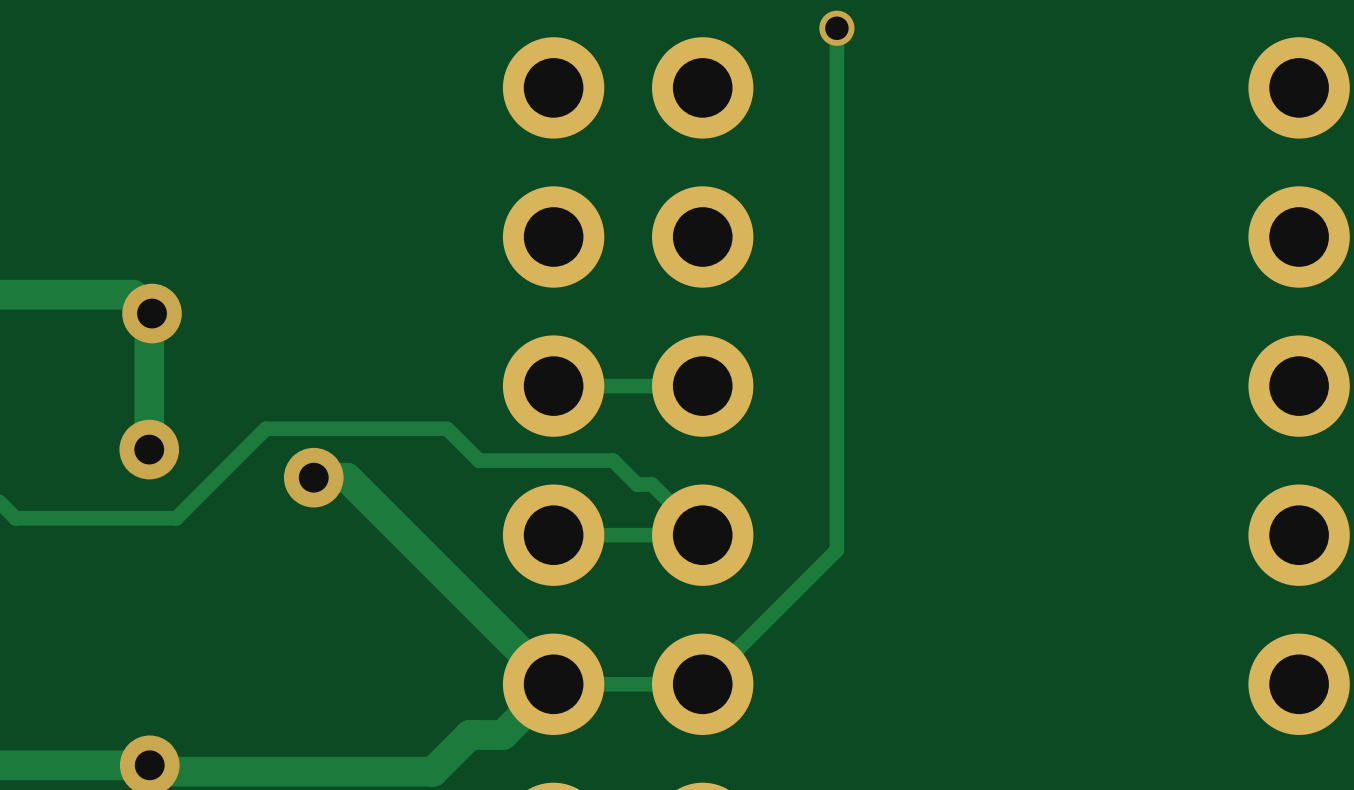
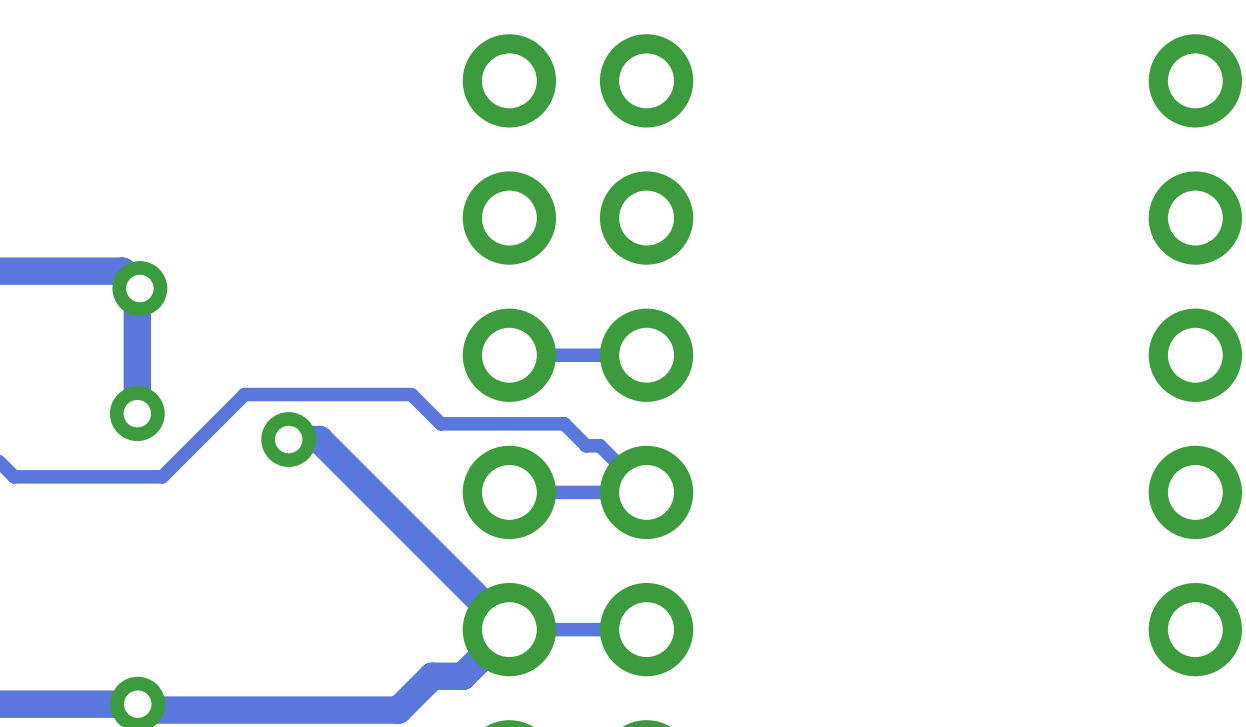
track: (836, 28) (836, 550) (702, 684) -> none
via: (836, 28) -> none

